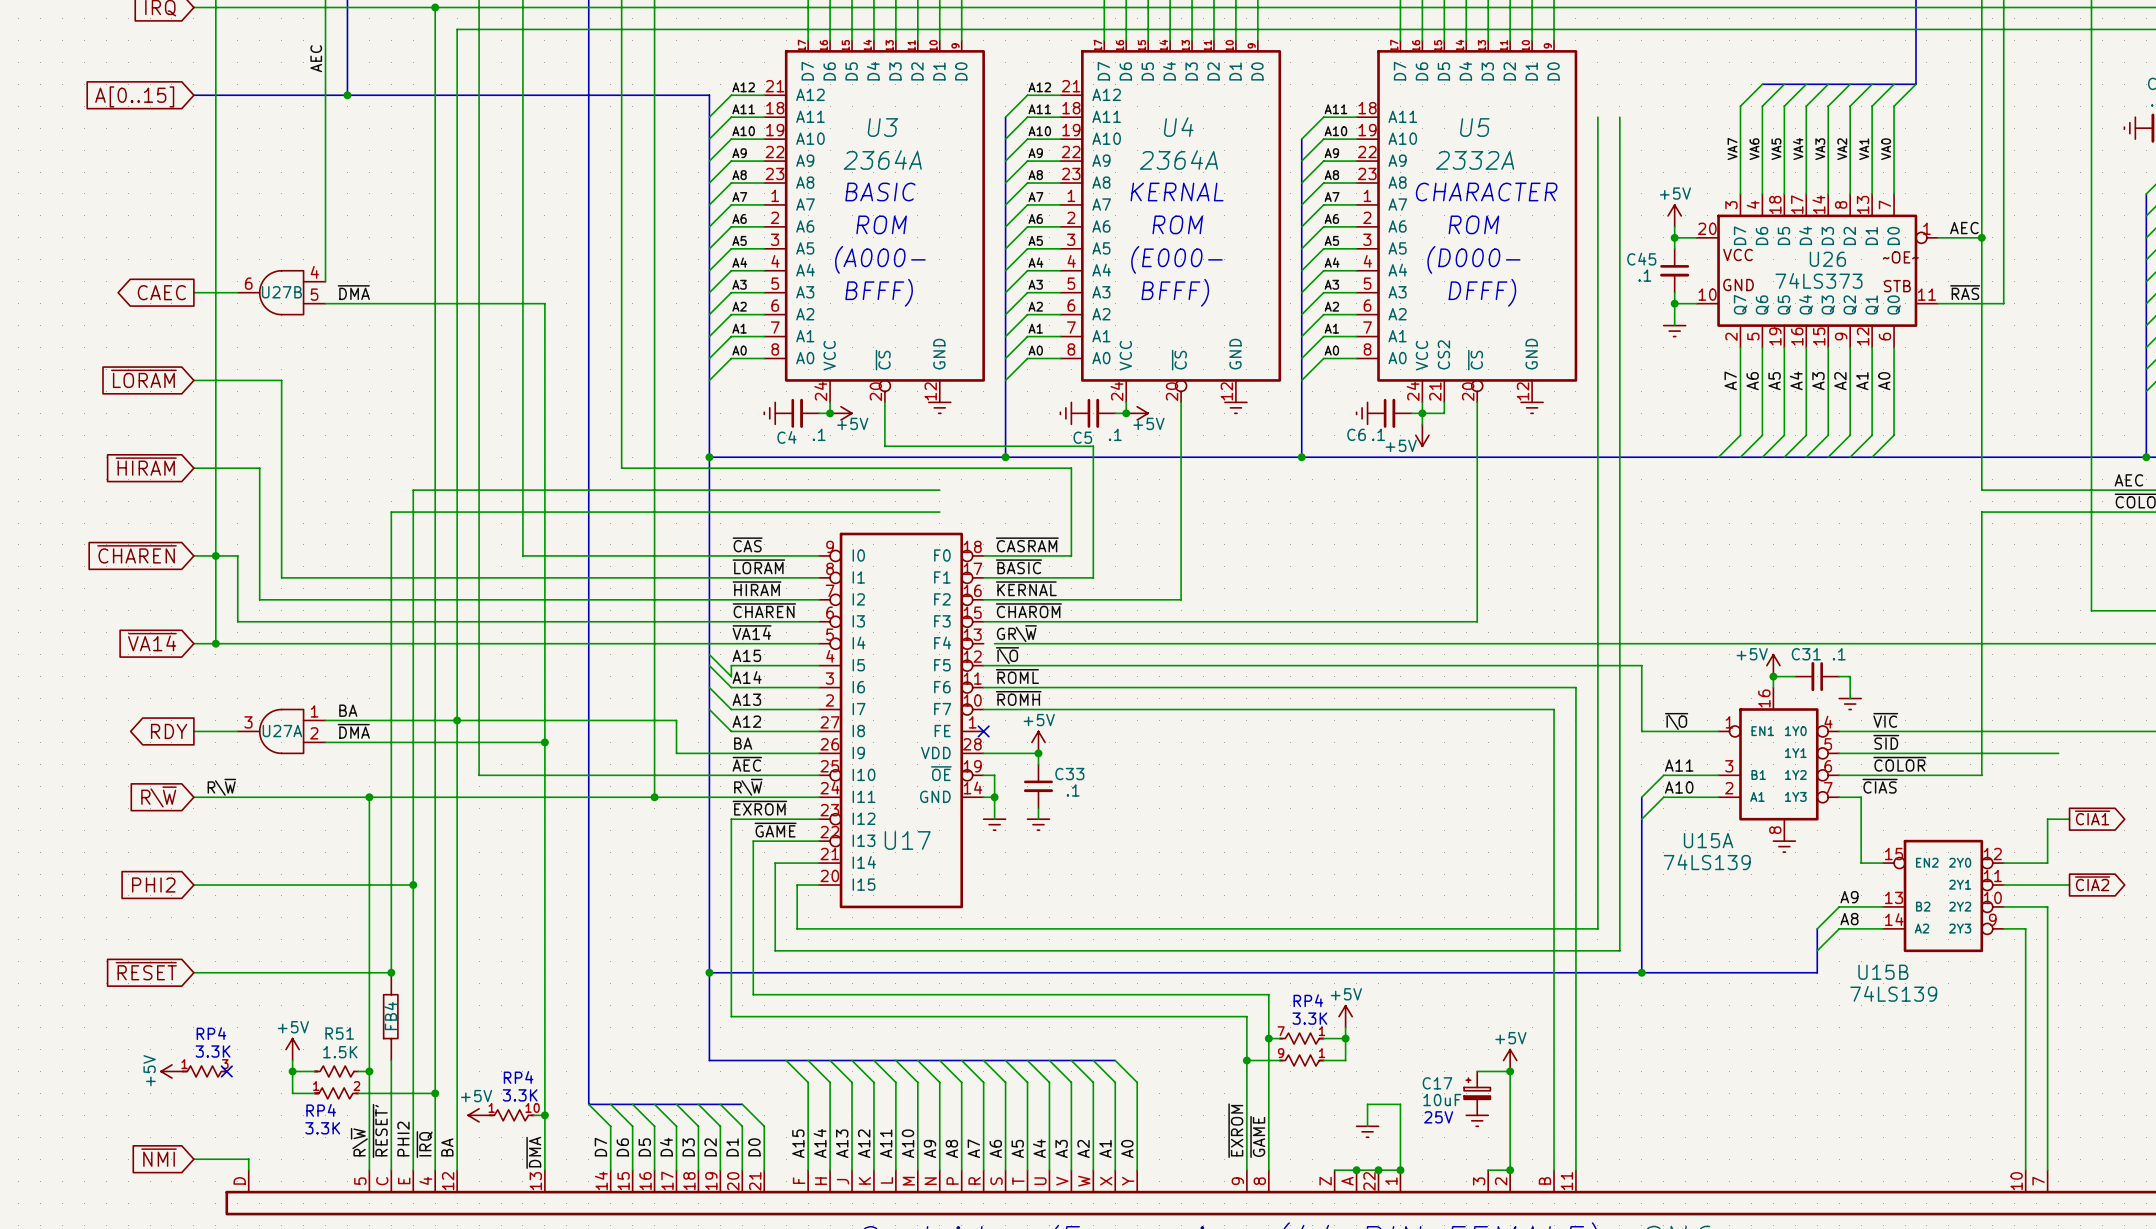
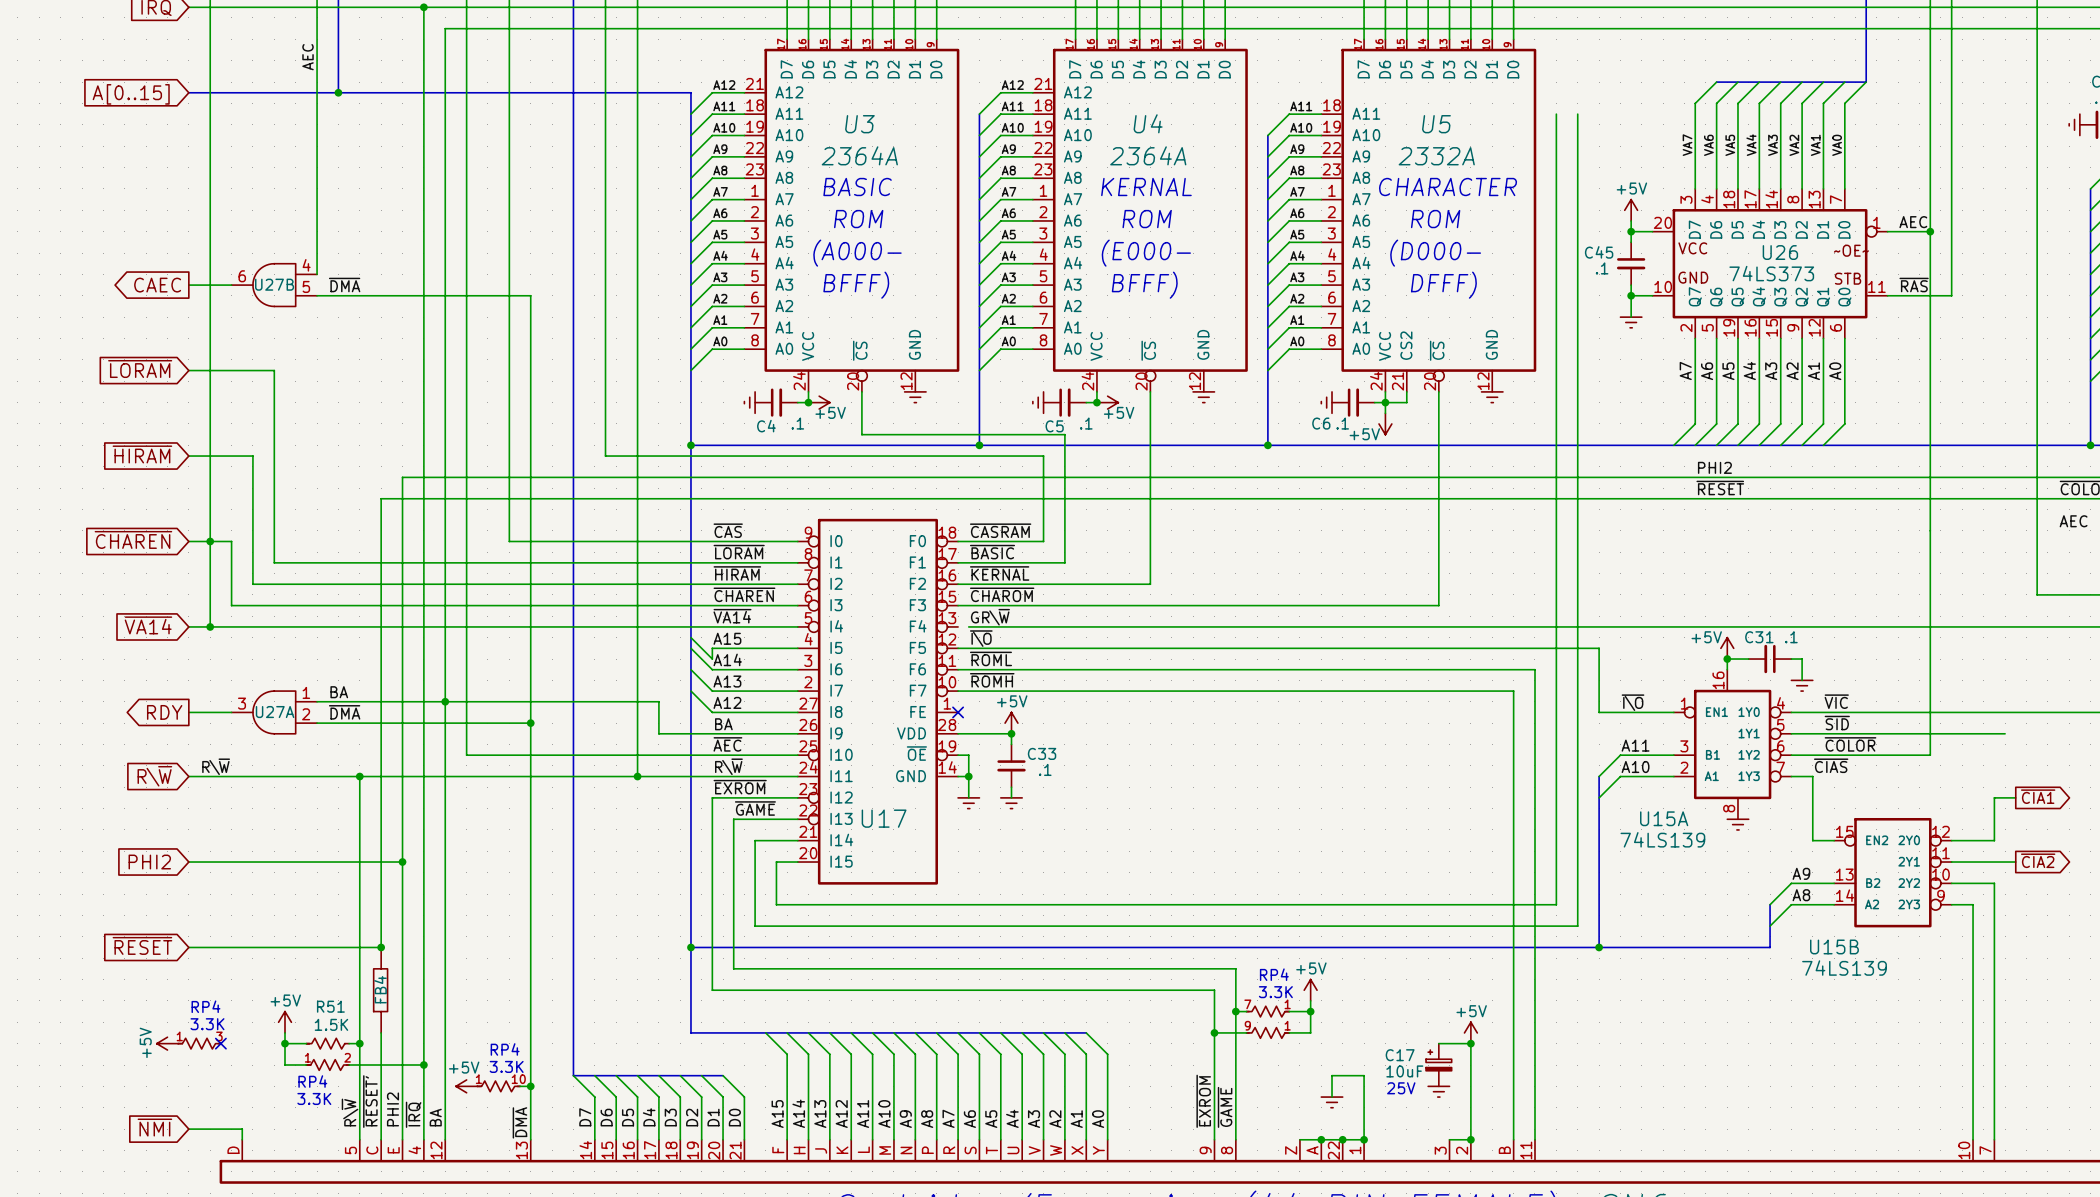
label: none -> PHI2 (1714, 467)
label position: AEC (2128, 480) -> AEC (2073, 521)
wire: none -> (915, 477) (1930, 477) (1930, 498) (915, 498)
label: none -> ~{RESET} (1720, 488)

